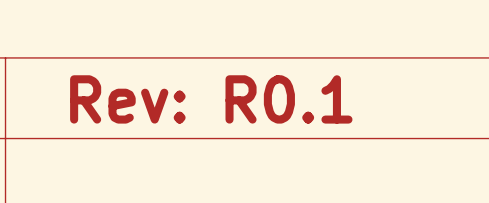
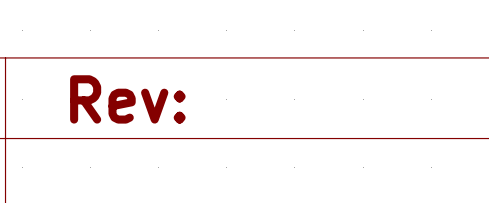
title block: Rev: R0.1 (211, 99) -> Rev: (127, 99)

